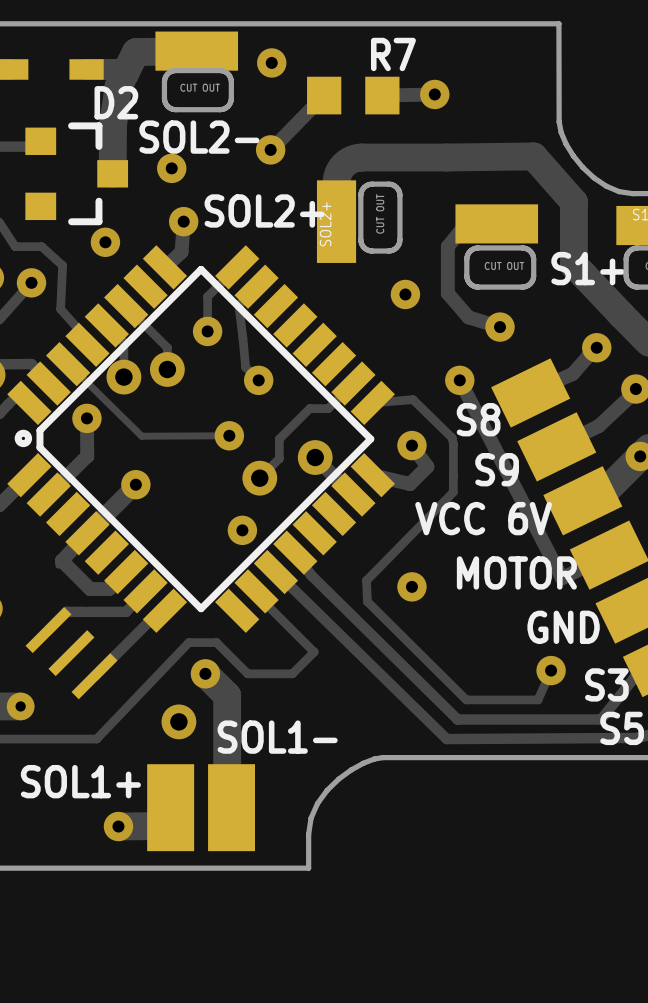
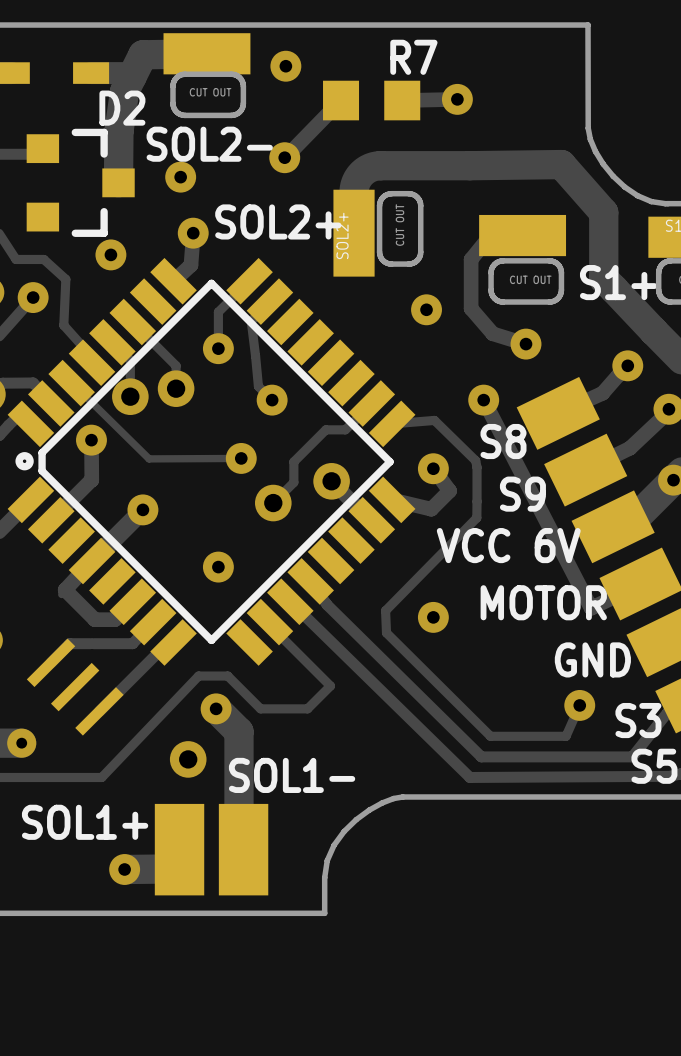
via position: (242, 530) -> (218, 567)

